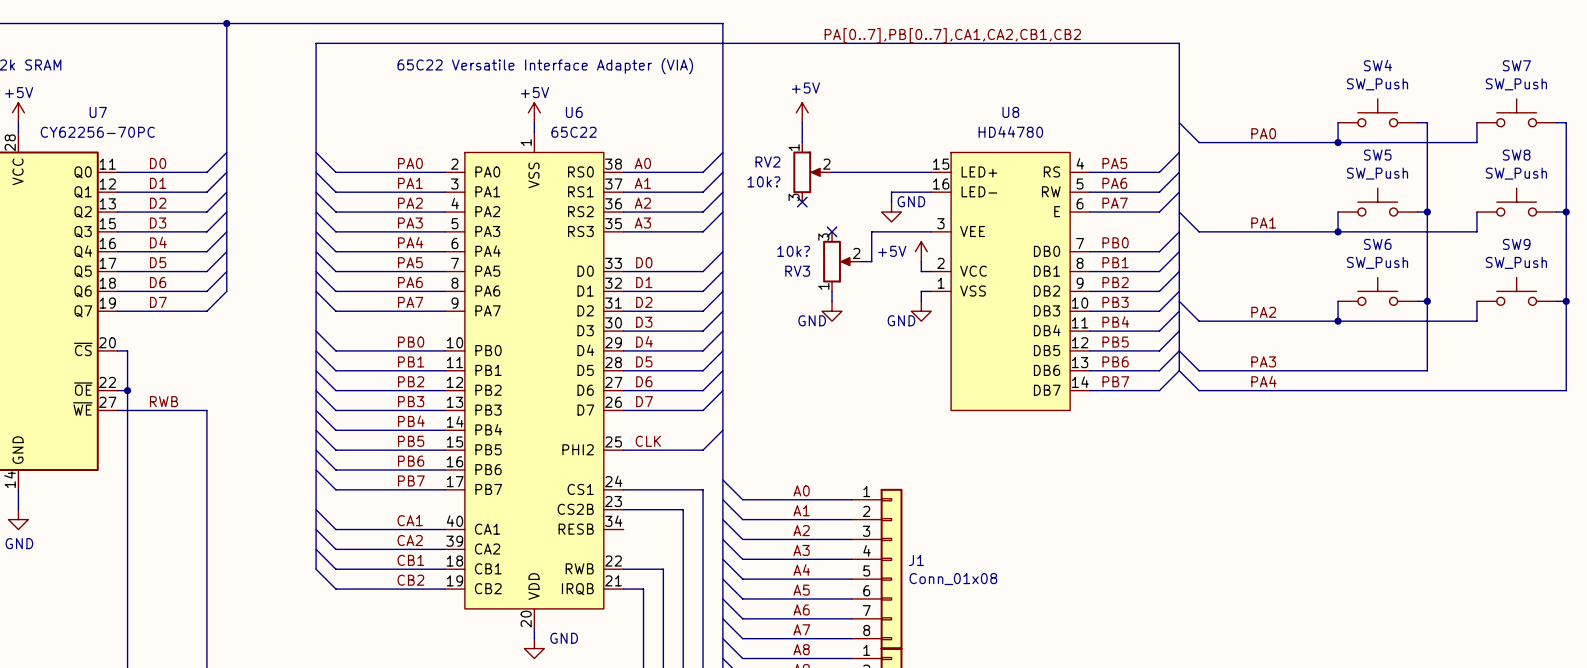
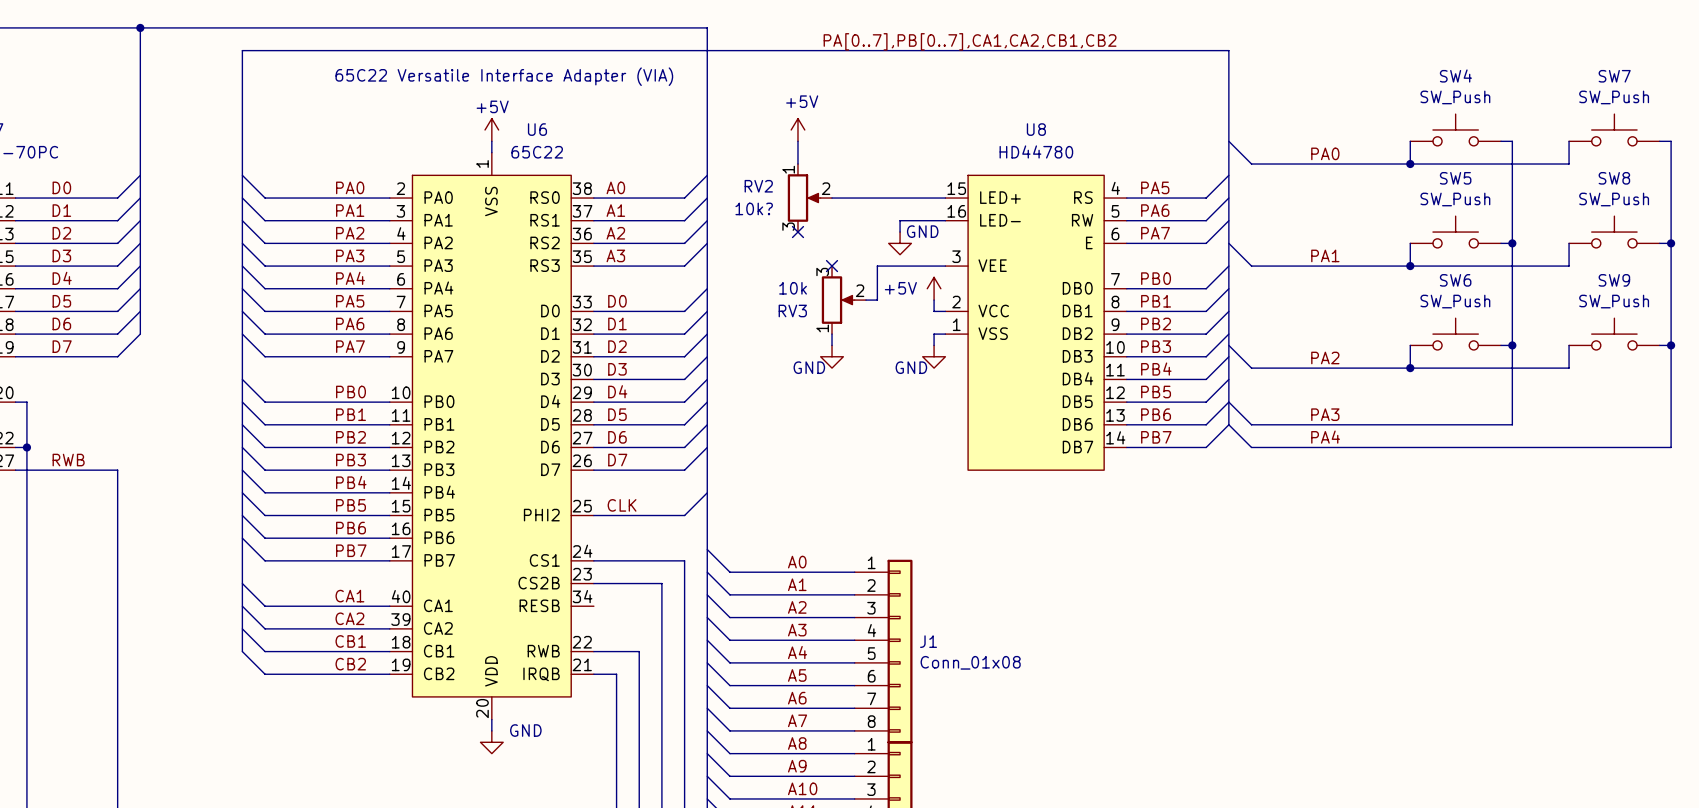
RV3 value: 10k? (793, 251) -> 10k (793, 288)

